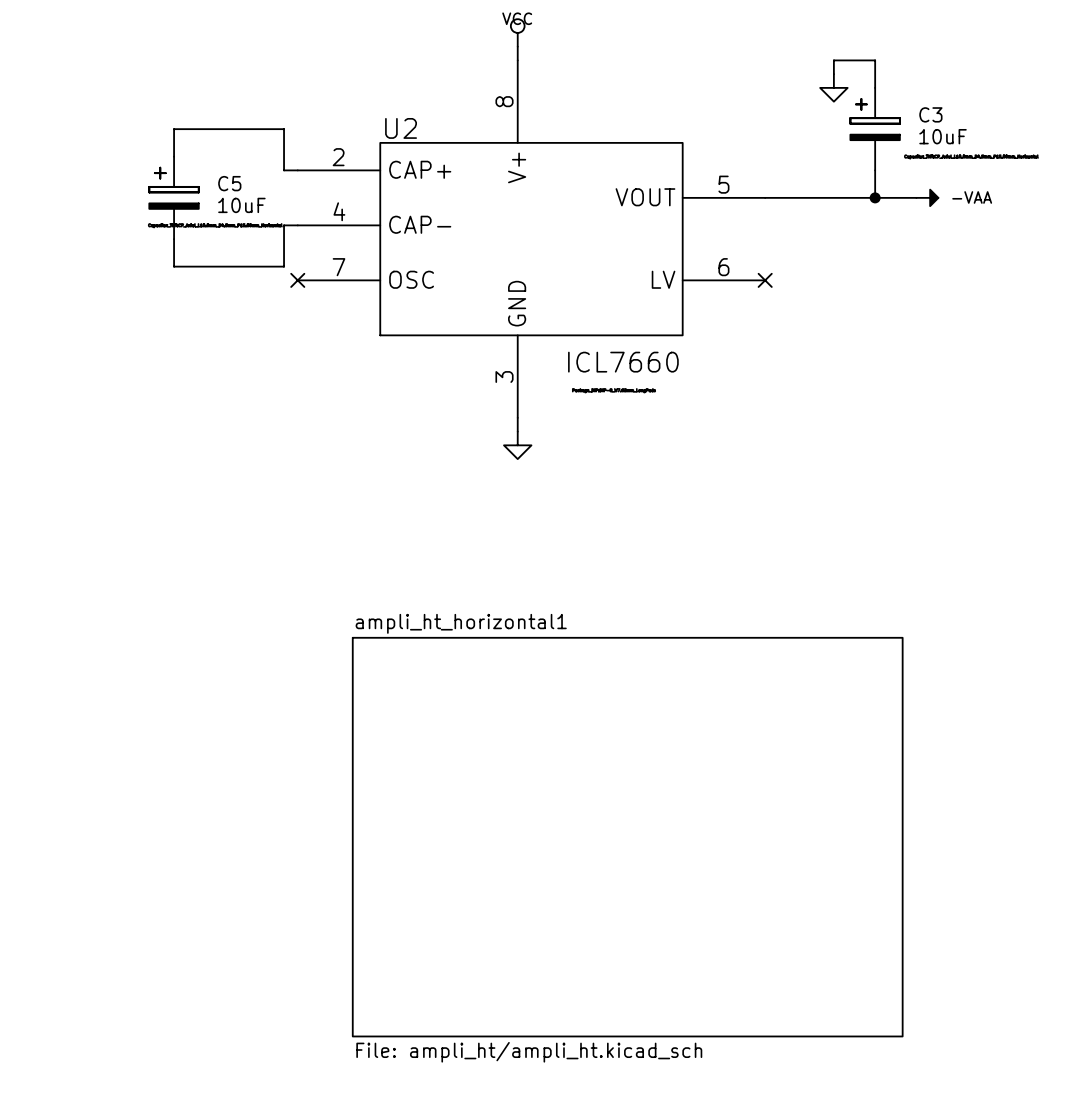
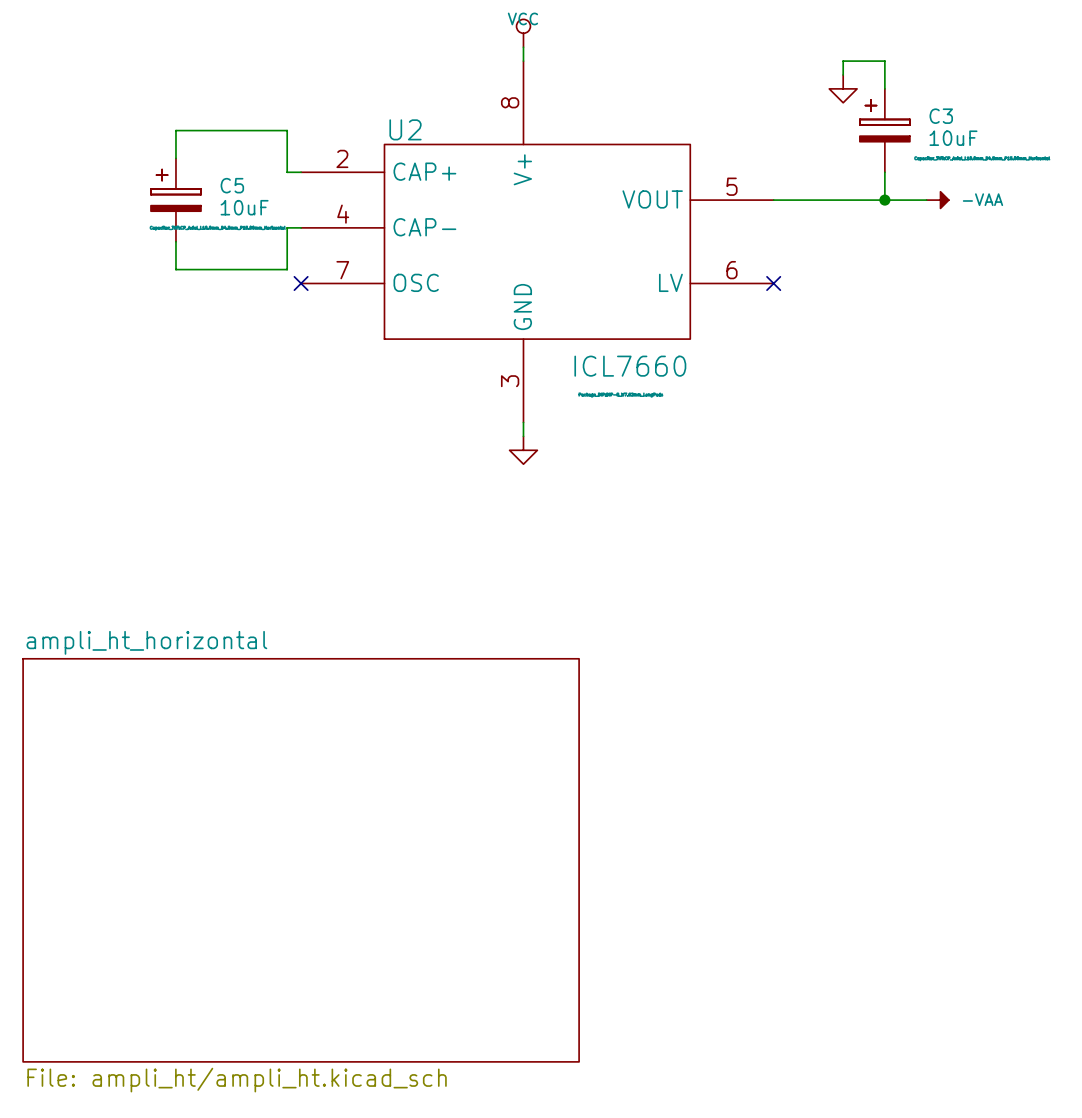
sheet ampli_ht_horizontal1: File: ampli_ht/ampli_ht.kicad_sch (627, 837) -> none
sheet ampli_ht_horizontal: none -> File: ampli_ht/ampli_ht.kicad_sch (301, 860)

